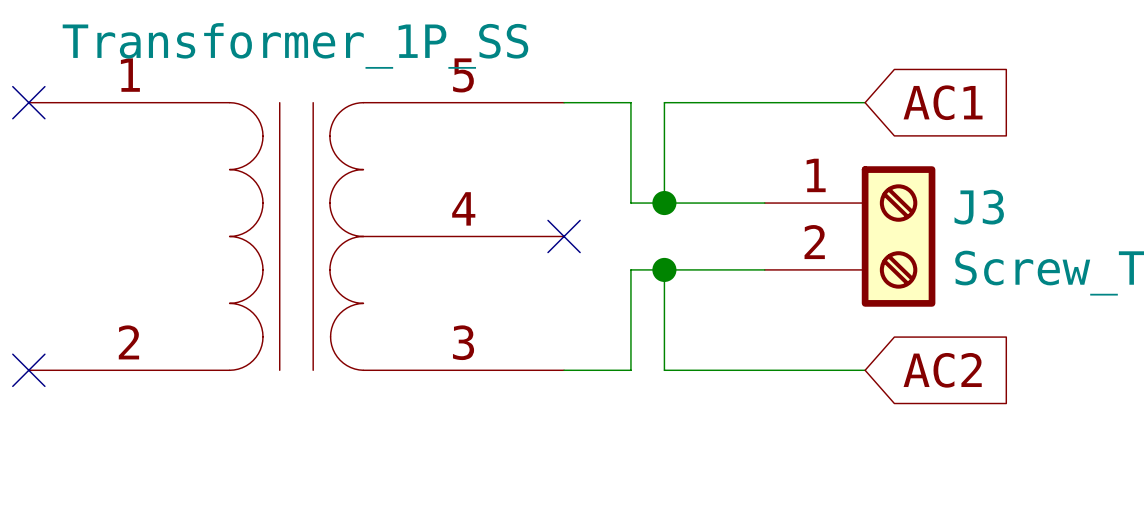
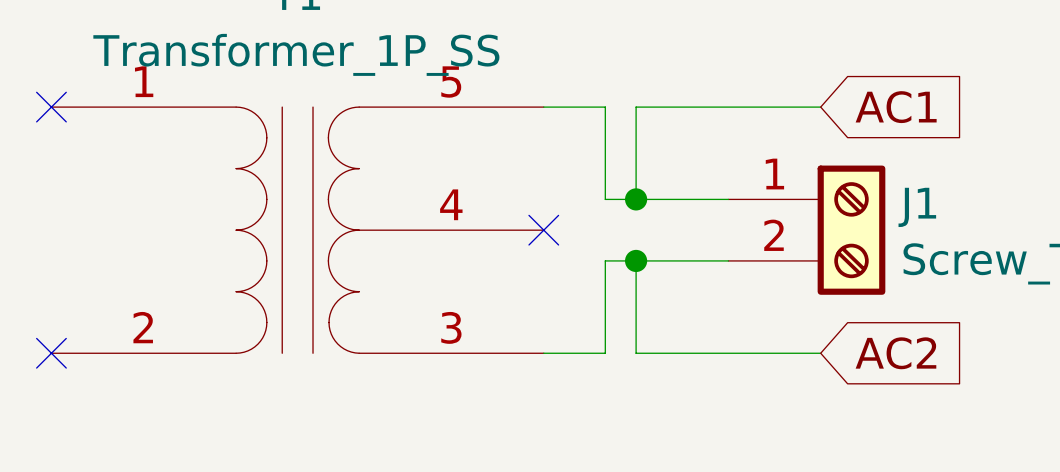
J3 name: J3 (979, 207) -> J1 (917, 207)

